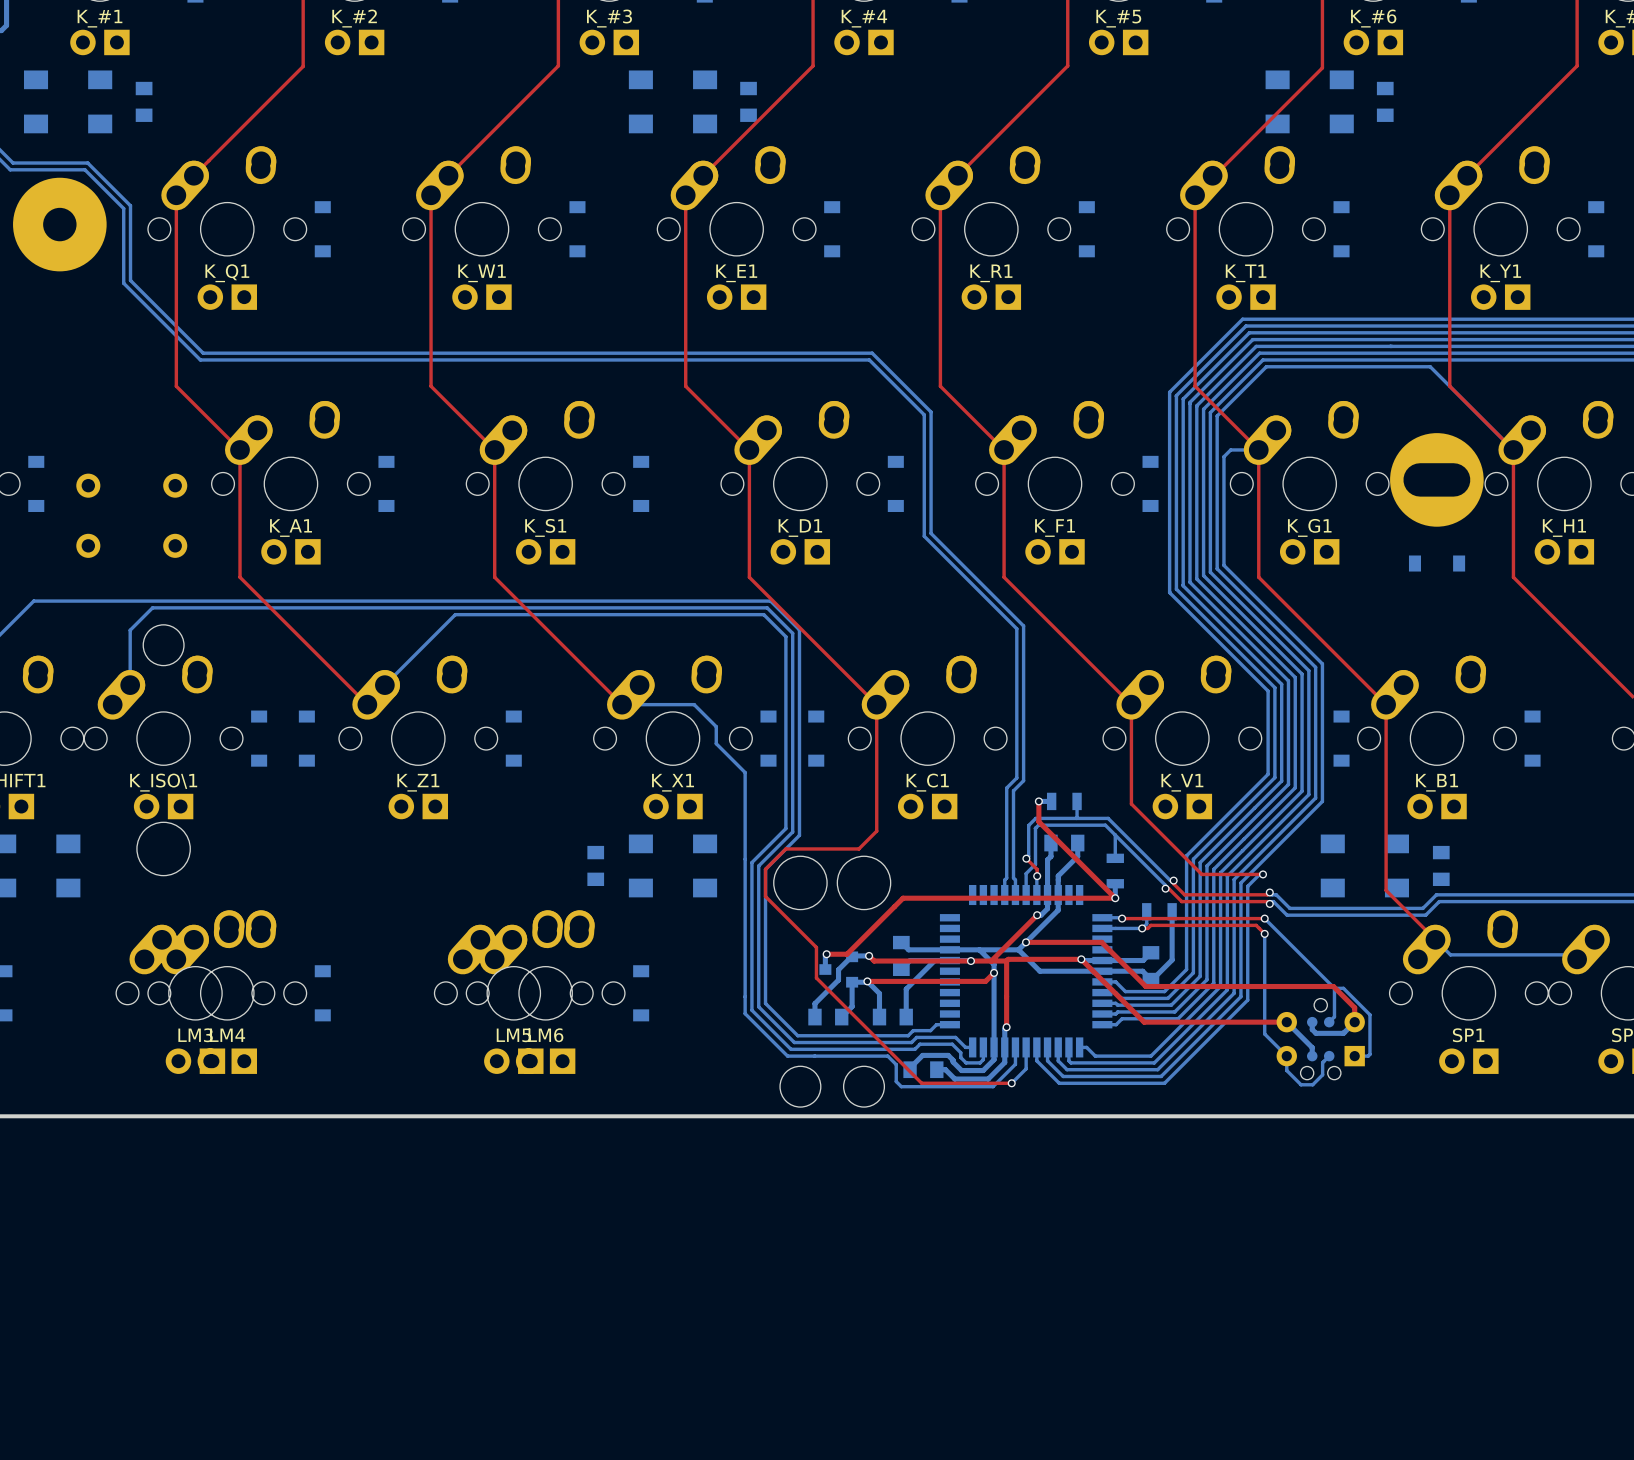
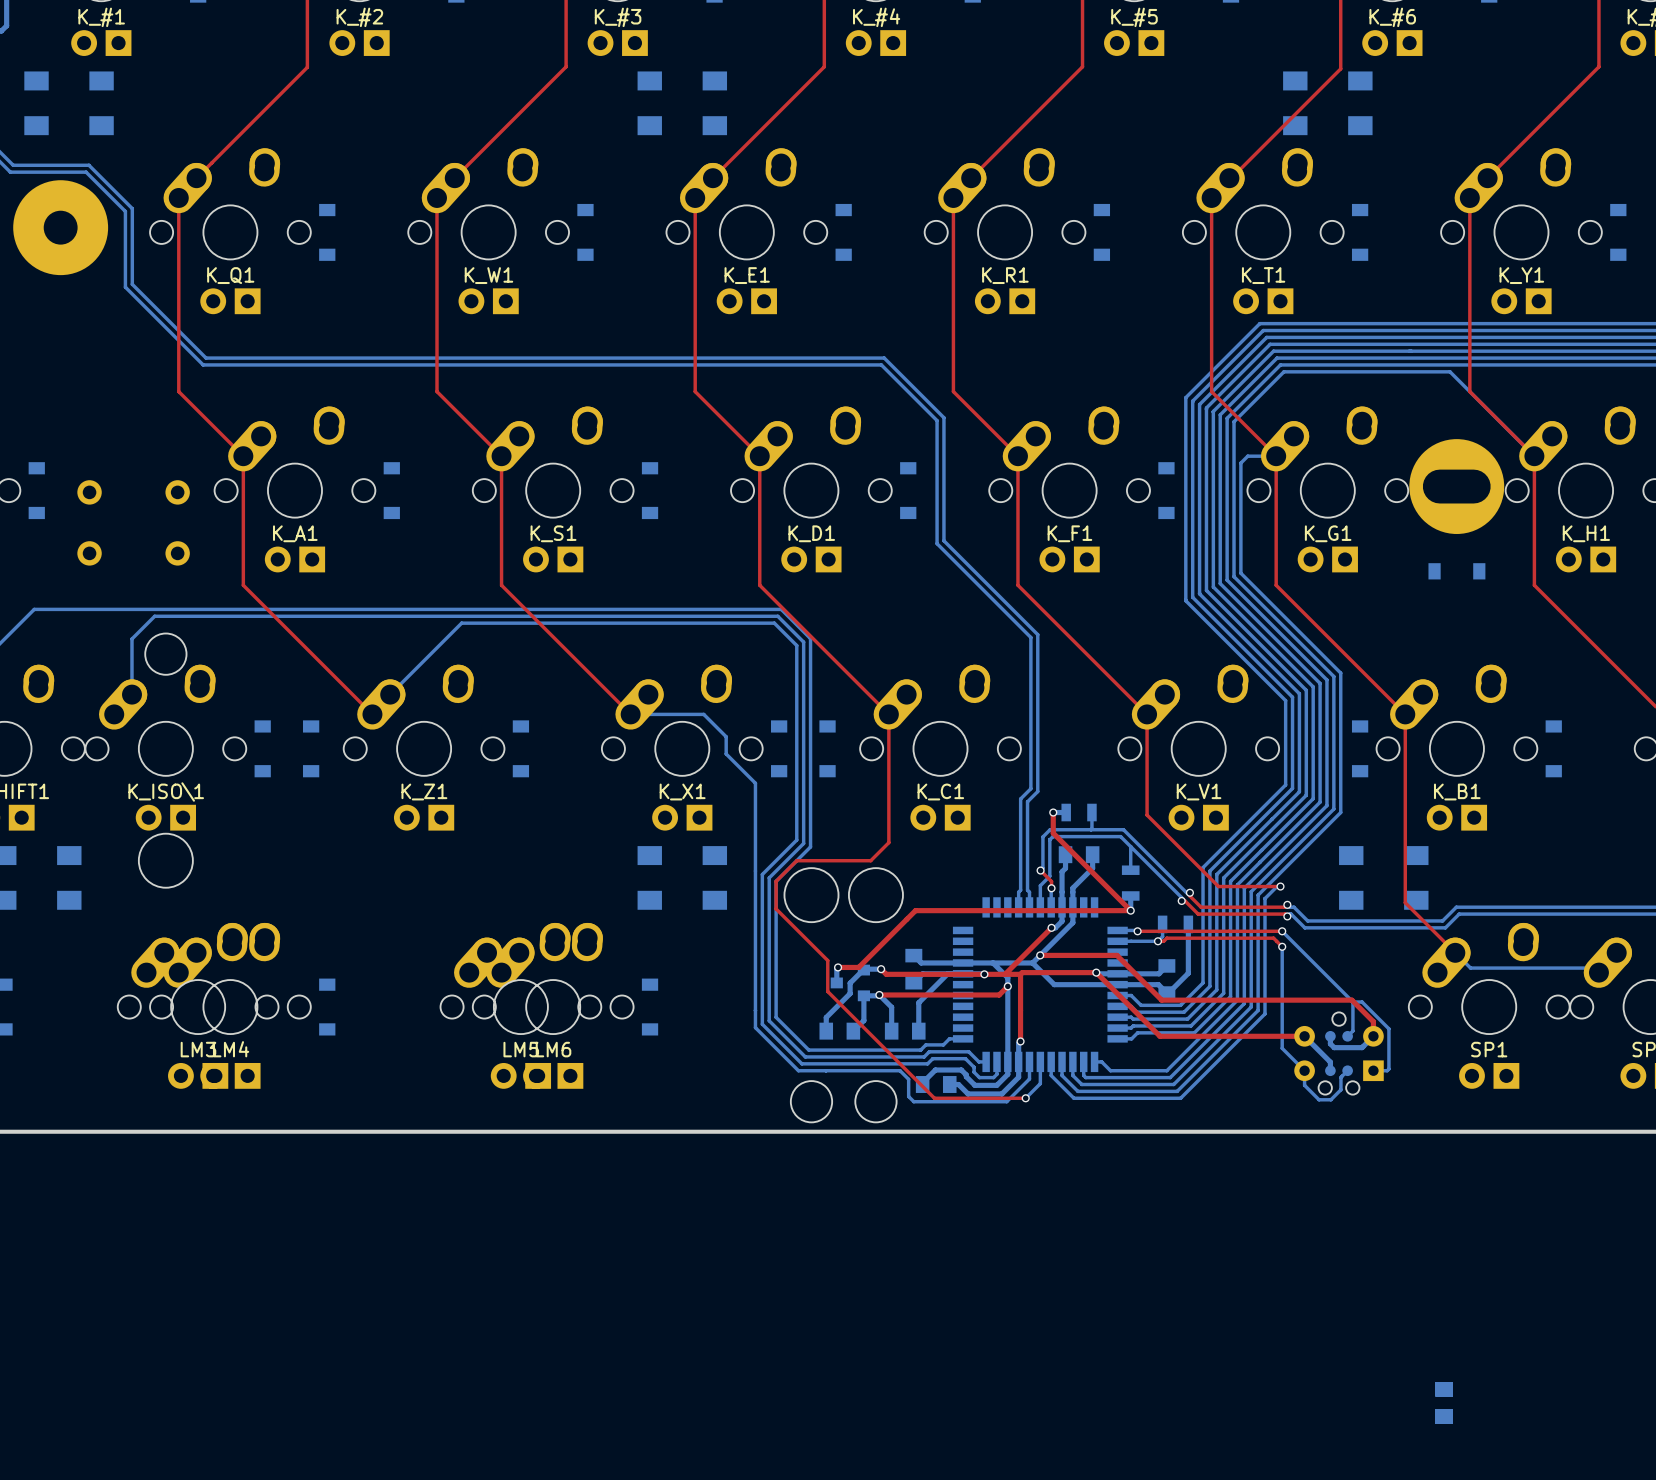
part: (144, 101) -> none
part: (748, 101) -> none
part: (1385, 101) -> none
part: (595, 865) -> none
part: (1441, 865) -> none
part: none -> (1444, 1402)

